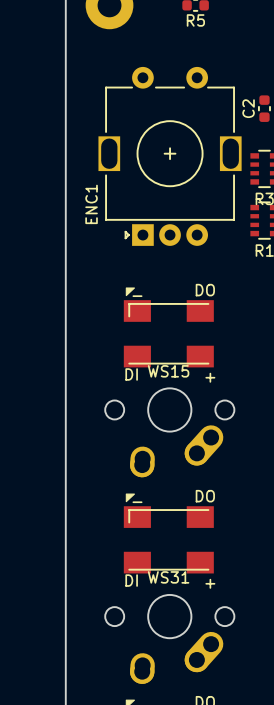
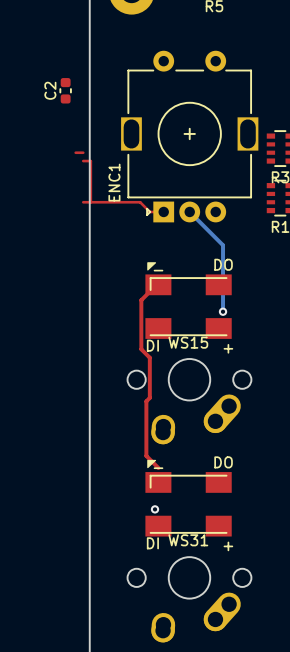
C2 position: (264, 108) -> (65, 90)
top track: none -> (75, 152) (83, 152)
top track: none -> (83, 161) (90, 161) (90, 202)
top track: none -> (83, 202) (140, 202) (149, 211) (163, 211)
bottom track: none -> (189, 211) (223, 245) (223, 311)
top track: none -> (158, 283) (141, 300) (141, 349) (149, 357) (149, 397) (146, 401) (146, 455) (158, 467)
via: none -> (223, 311)
via: none -> (155, 509)

